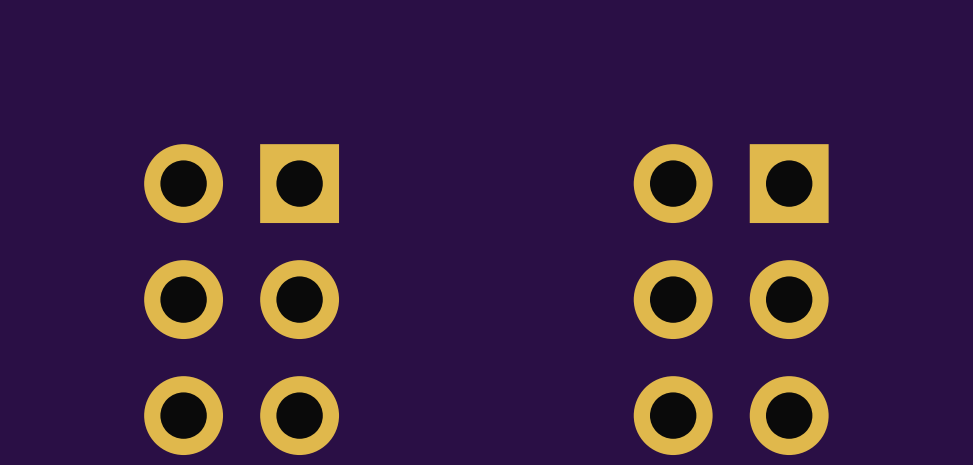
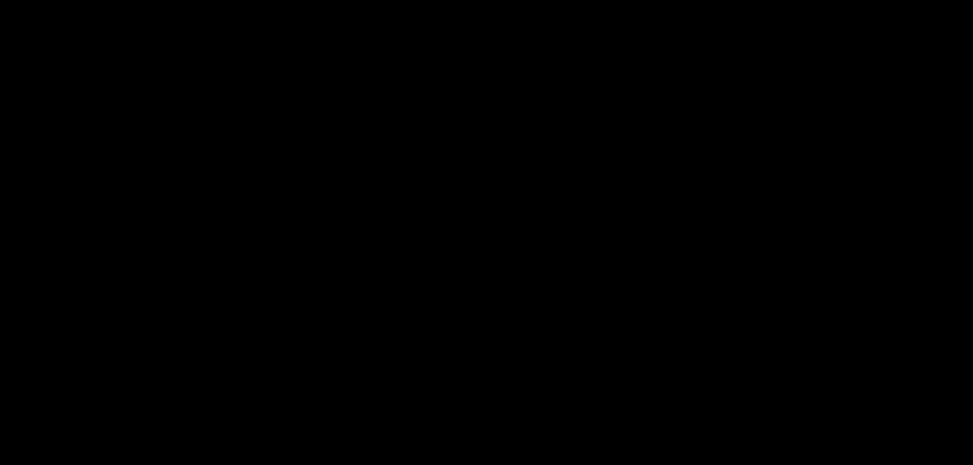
part: (241, 299) -> none
part: (731, 299) -> none

